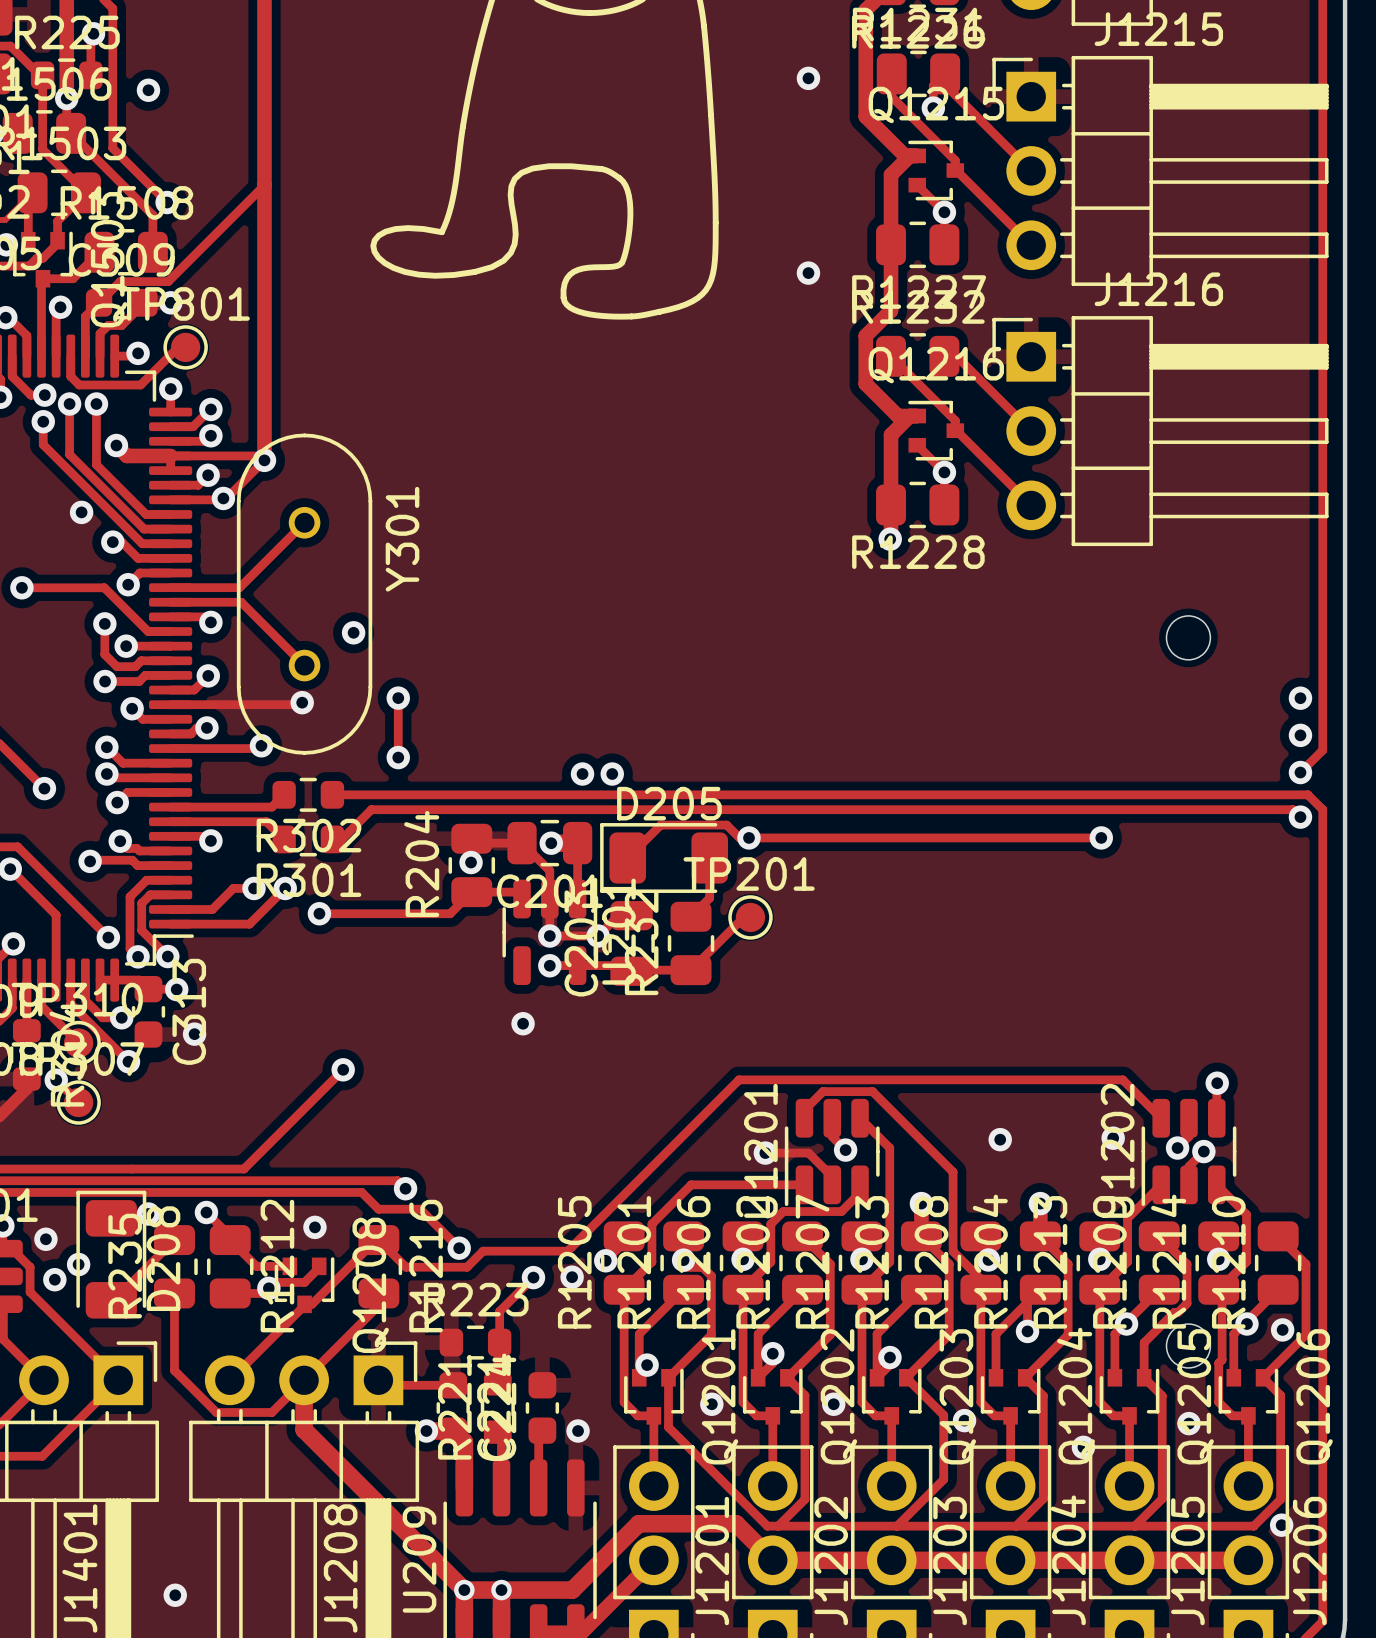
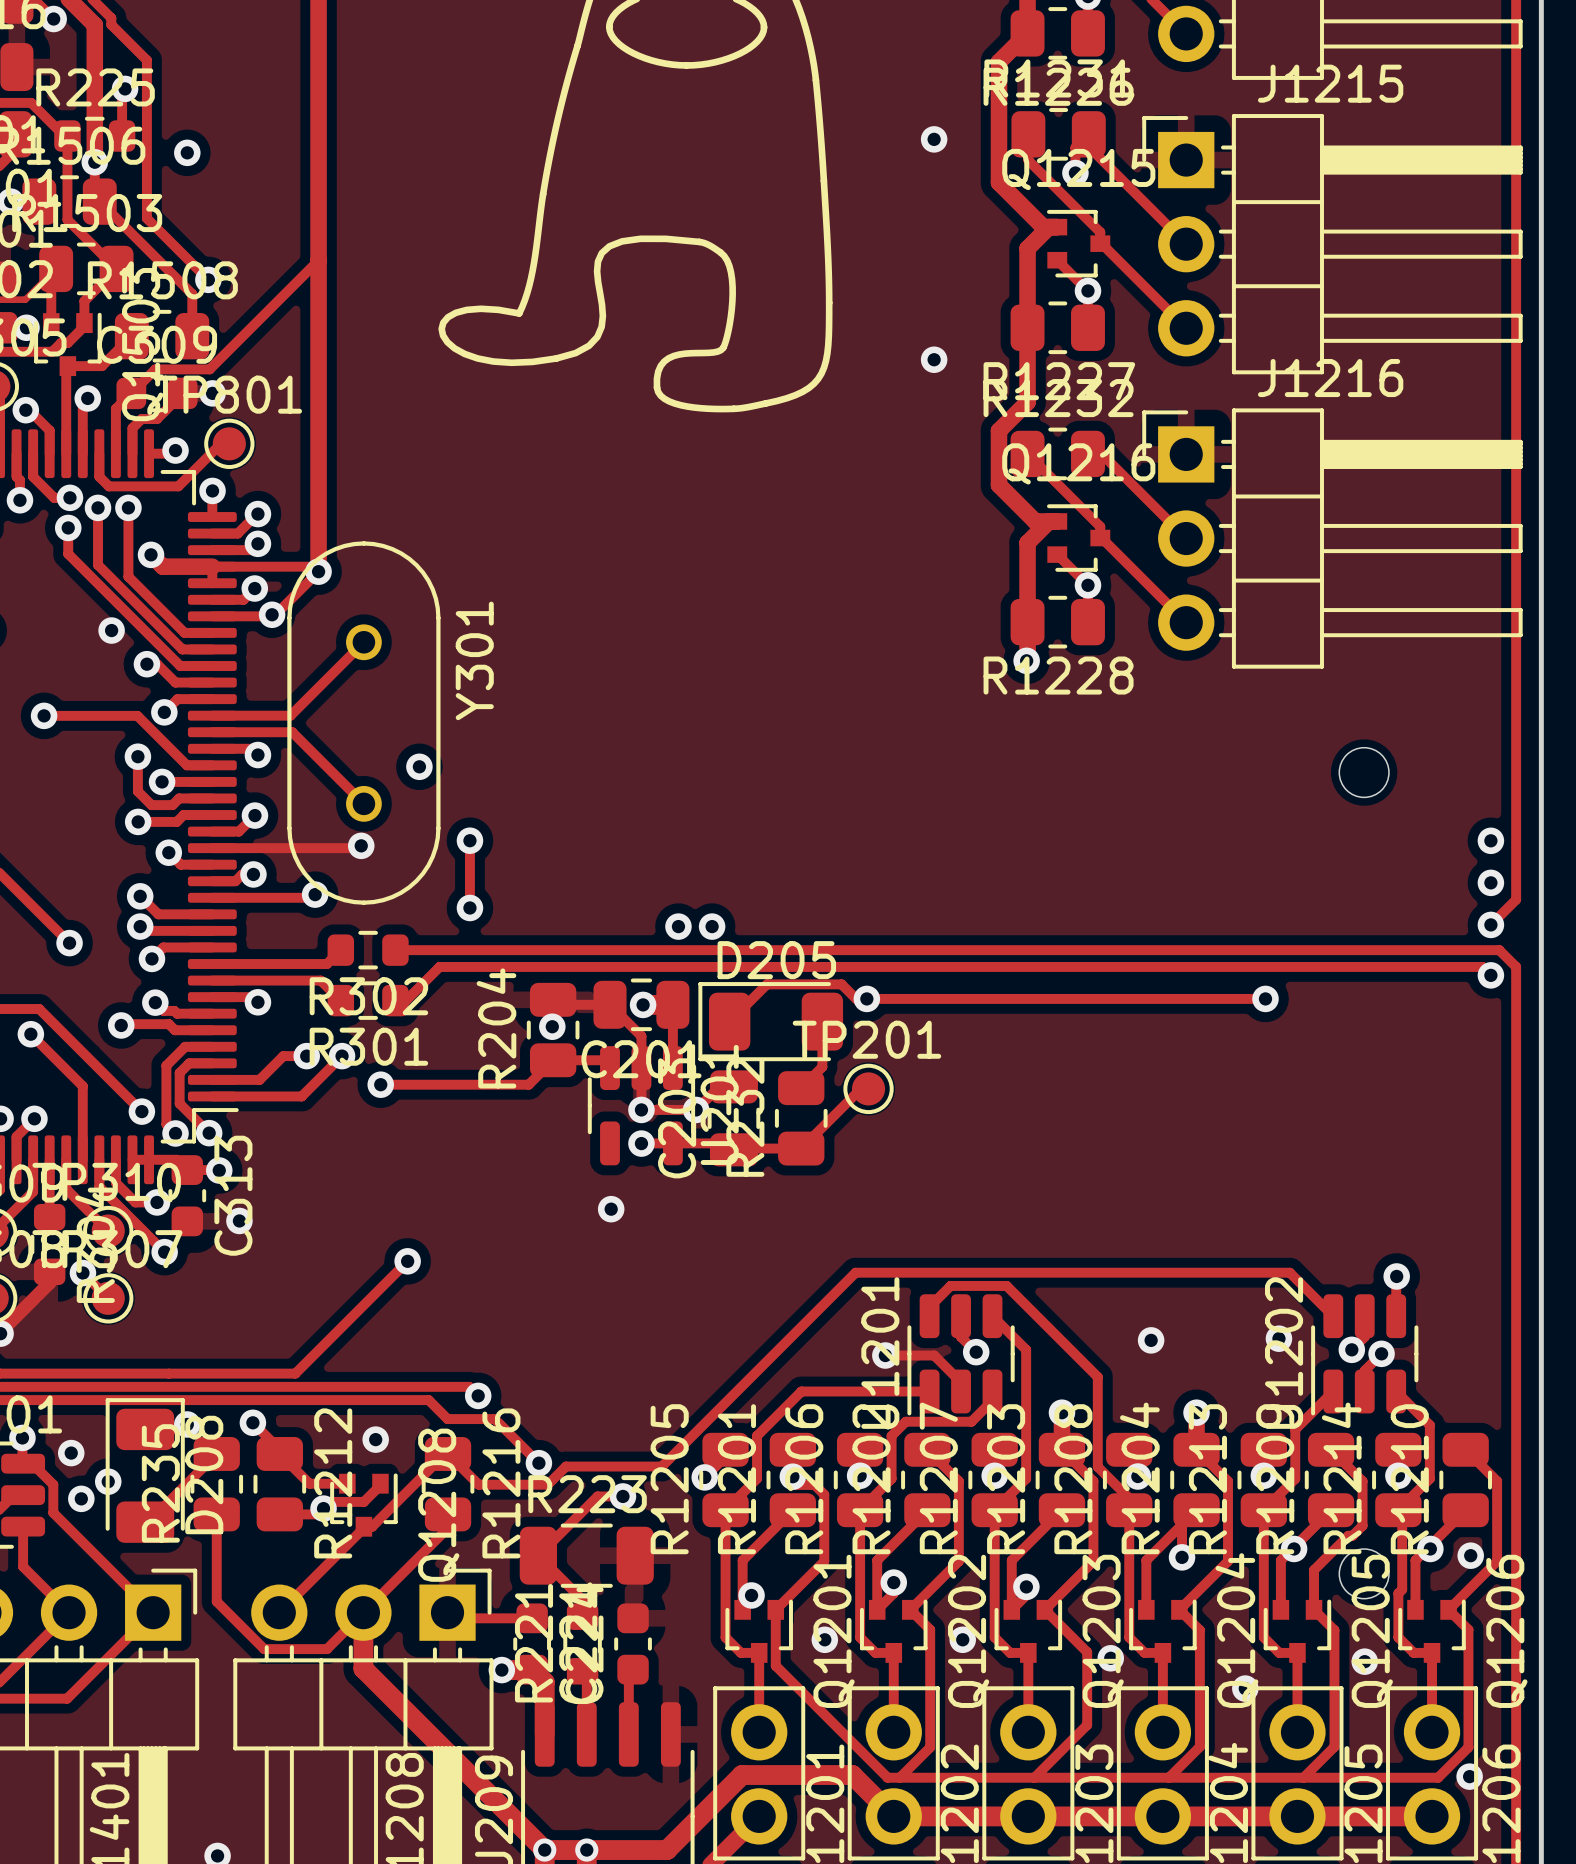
track: (533, 1277) (499, 1311) (497, 1369) -> (622, 1496) (597, 1496) (538, 1555) (582, 1599)
via: (572, 1277) -> none
R223 footprint: [439, 1325, 512, 1360] -> [519, 1523, 654, 1588]
via: (578, 1431) -> none

